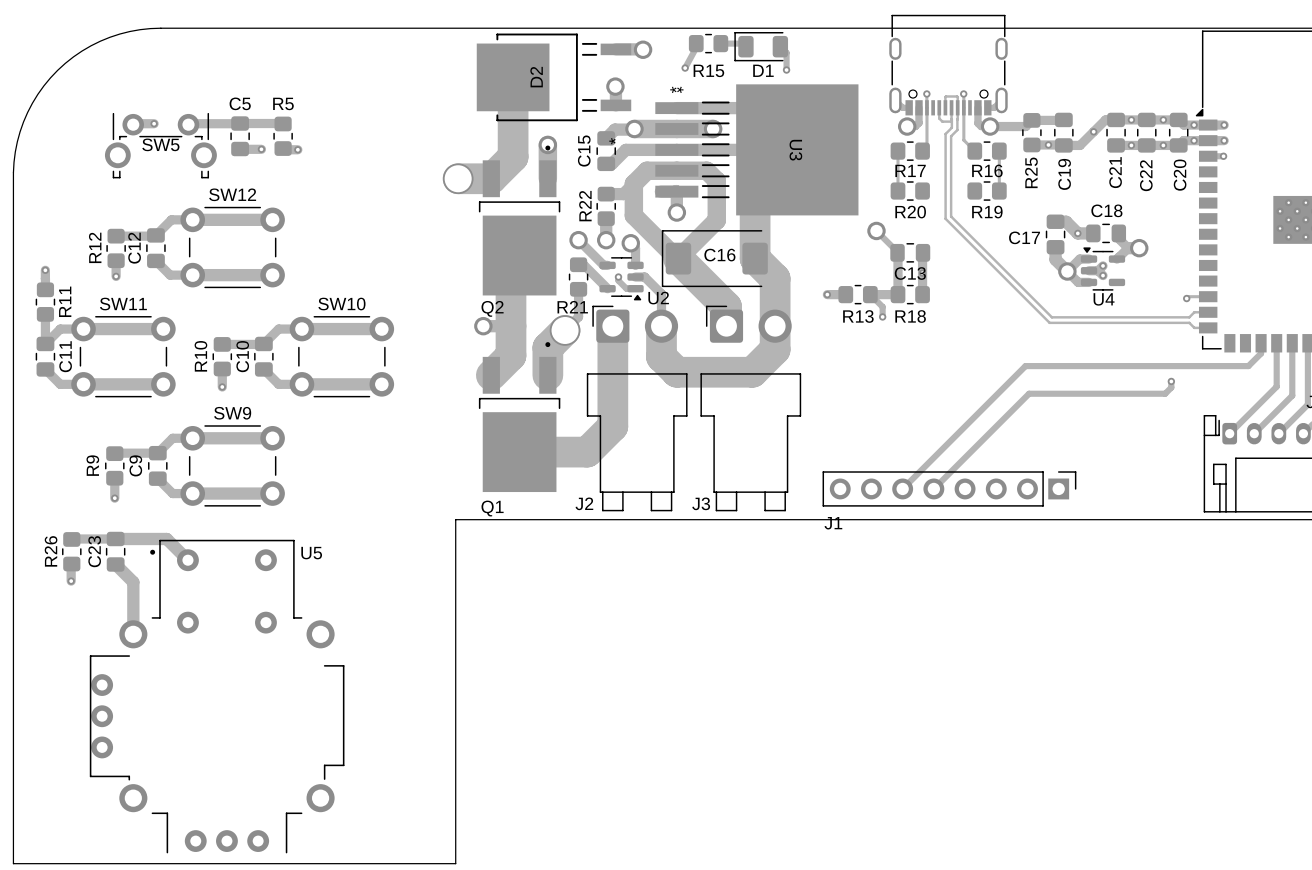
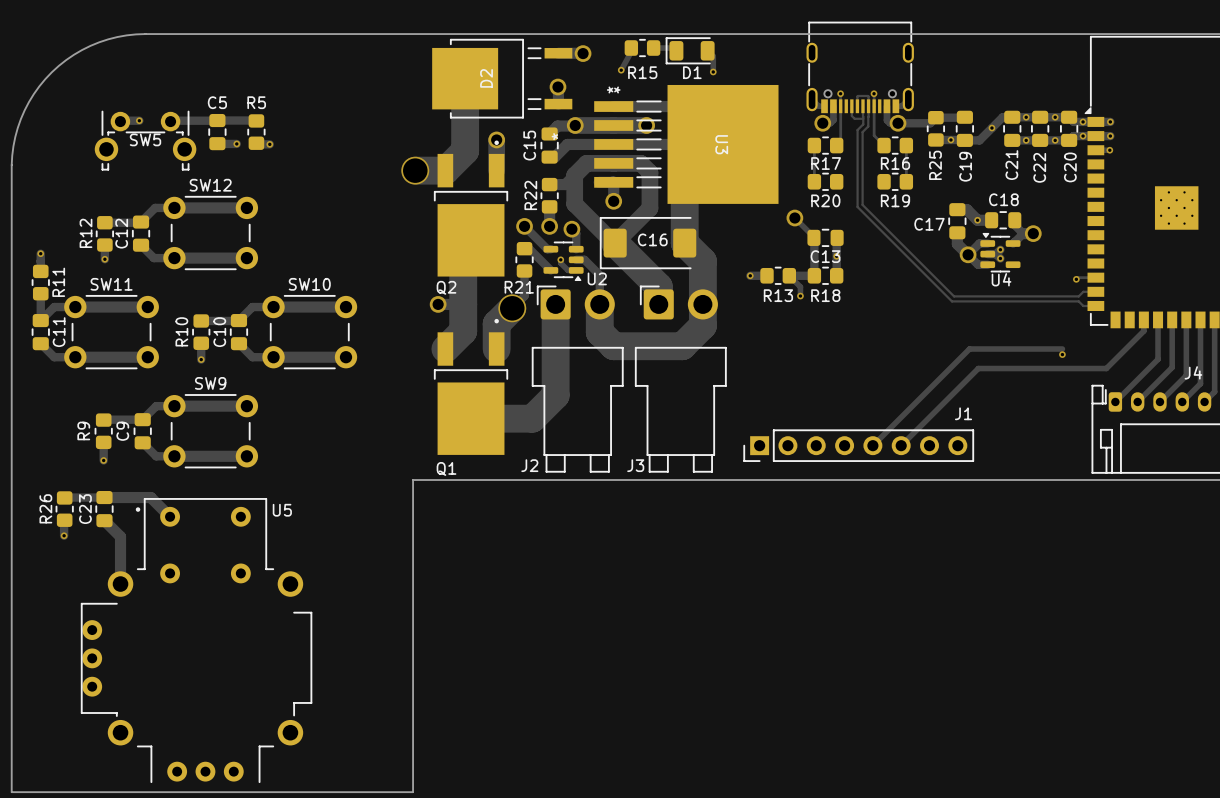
track: (1261, 353) (1248, 366) (1025, 366) (902, 488) -> (1143, 329) (1106, 368) (978, 368) (901, 445)
track: none -> (1062, 349) (969, 349) (872, 445)
track: (1171, 381) (1171, 387) (1165, 393) (1029, 393) (933, 488) -> none
J1 rotation: 0° (949, 488) -> 180° (858, 445)

